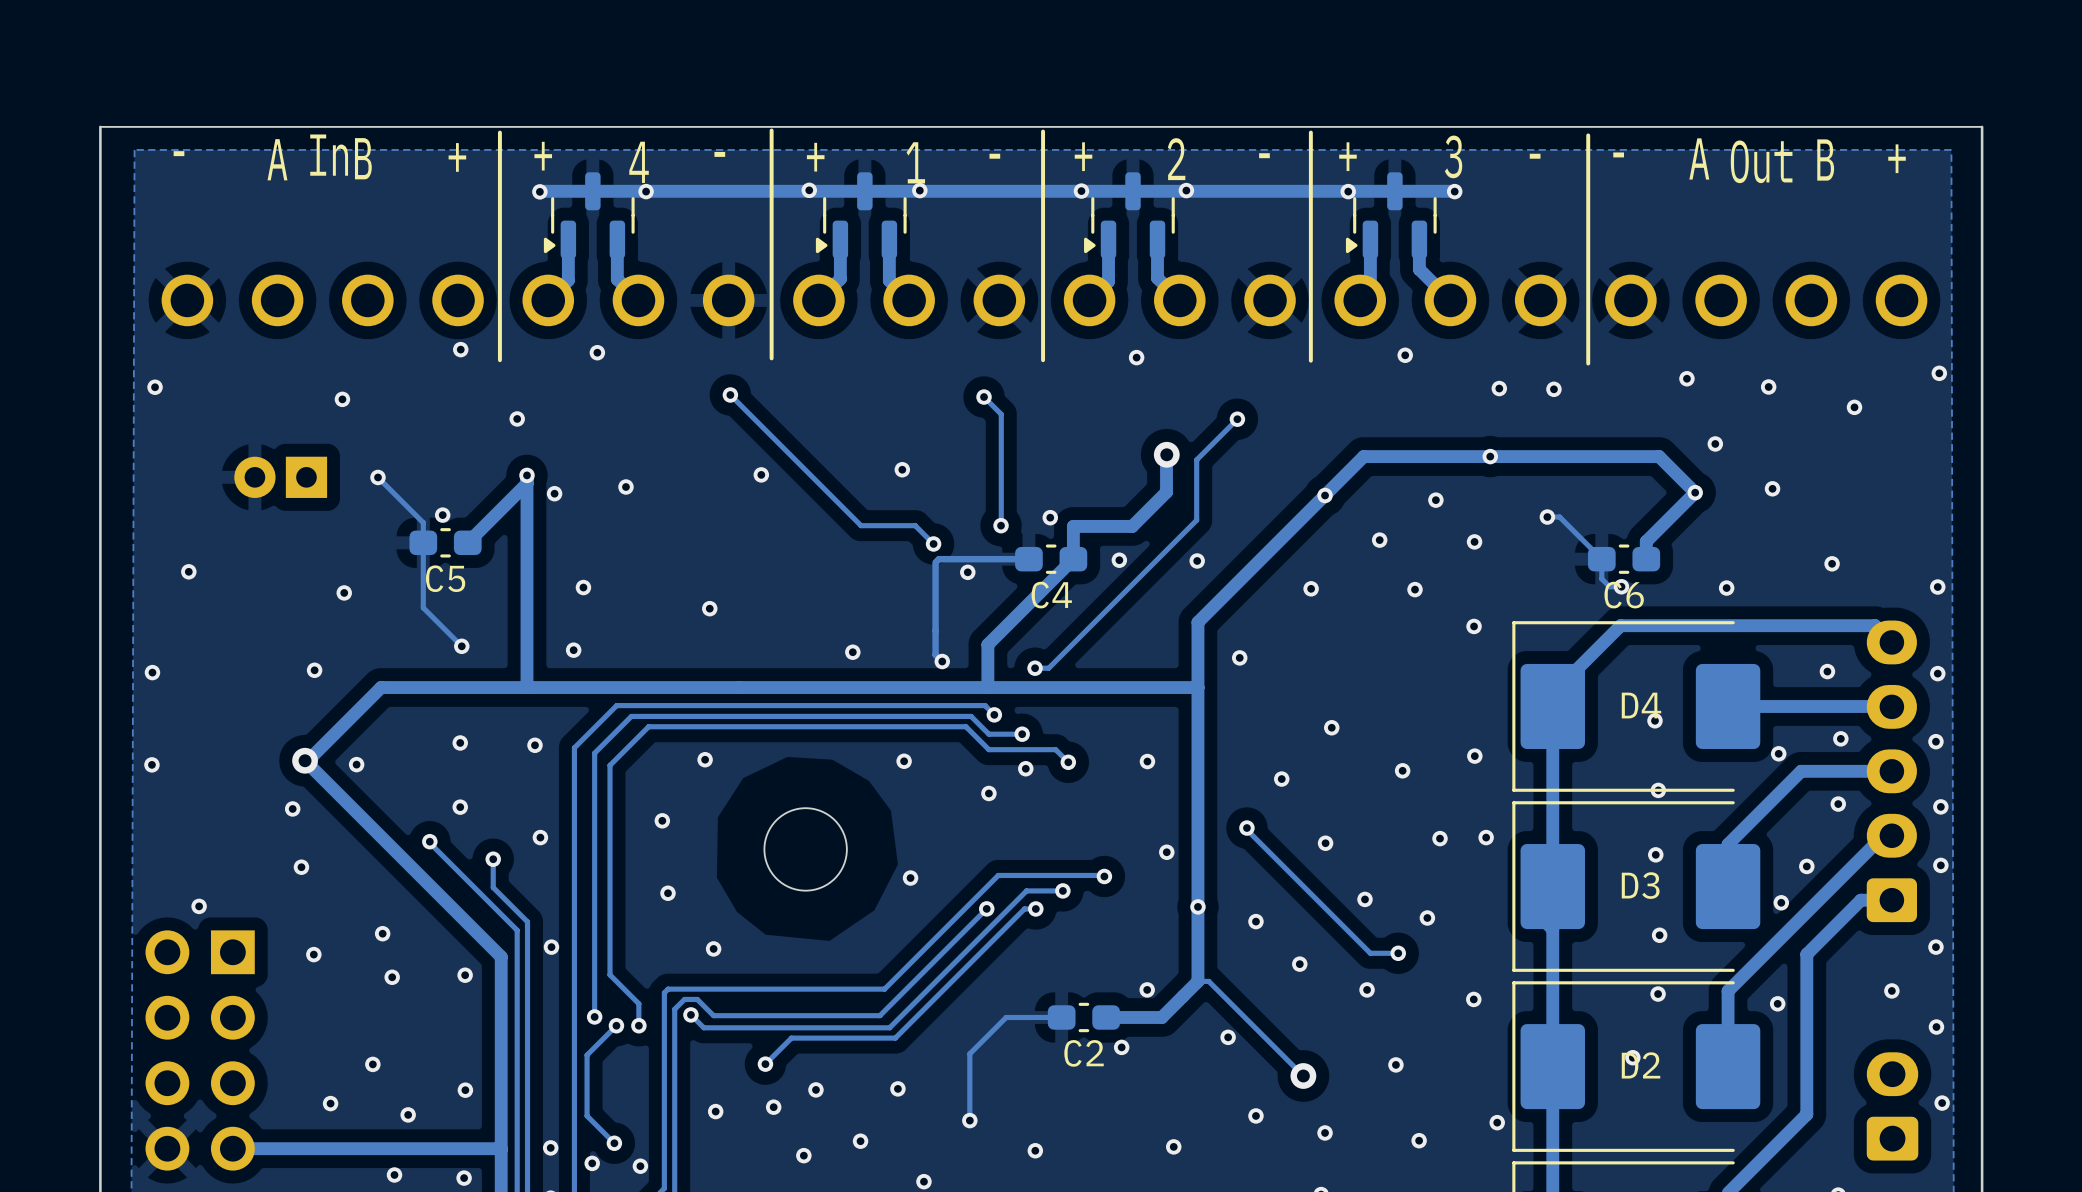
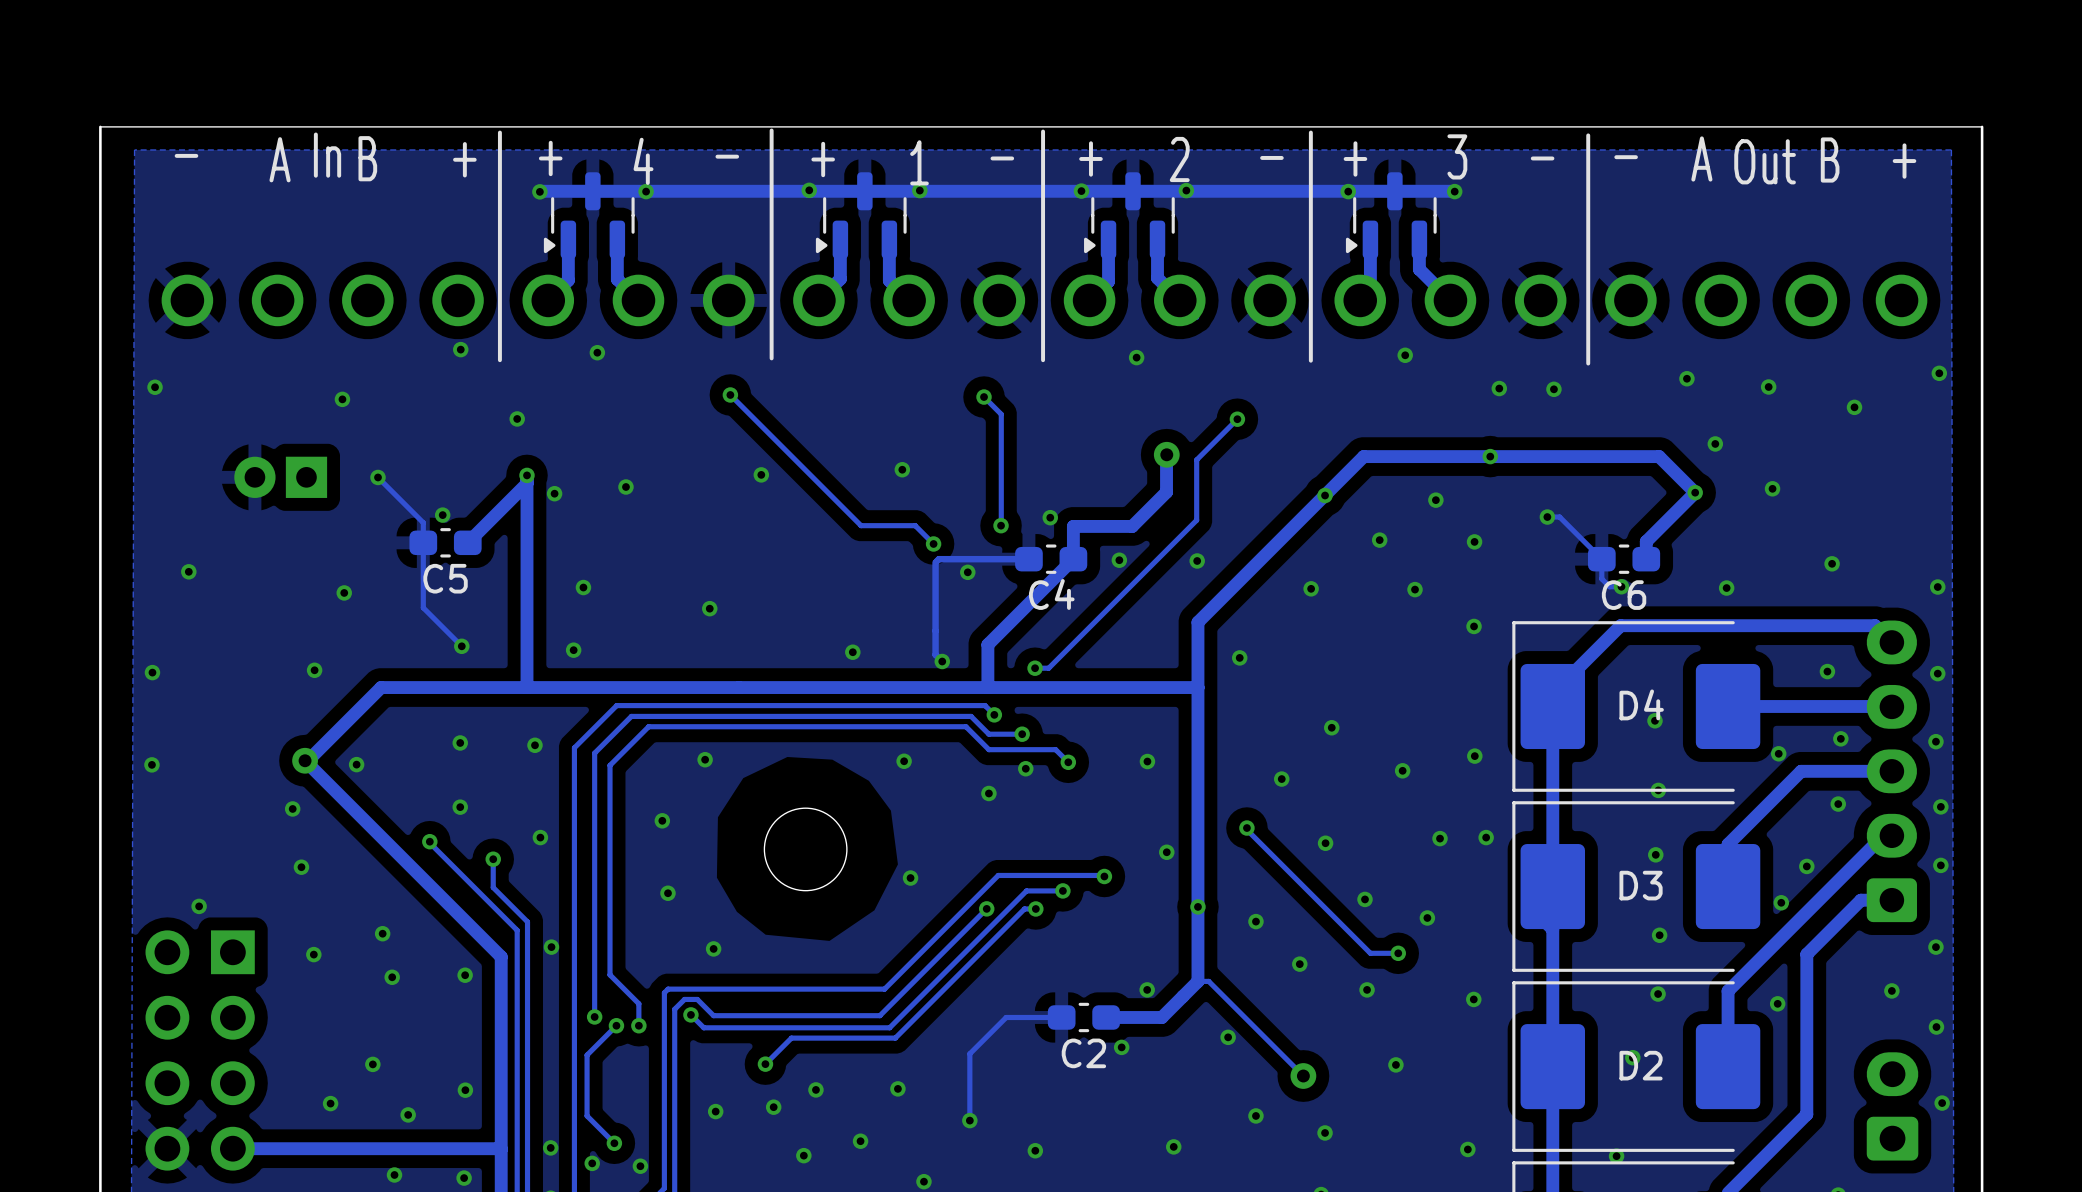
via: (1497, 1122) -> none
via: (1419, 1140) -> none
via: none -> (1467, 1149)
via: none -> (1616, 1156)

